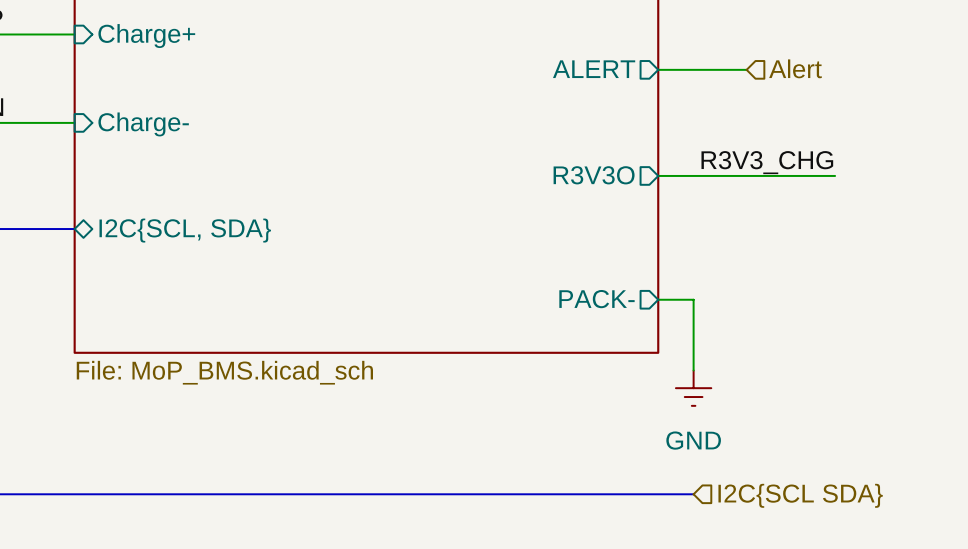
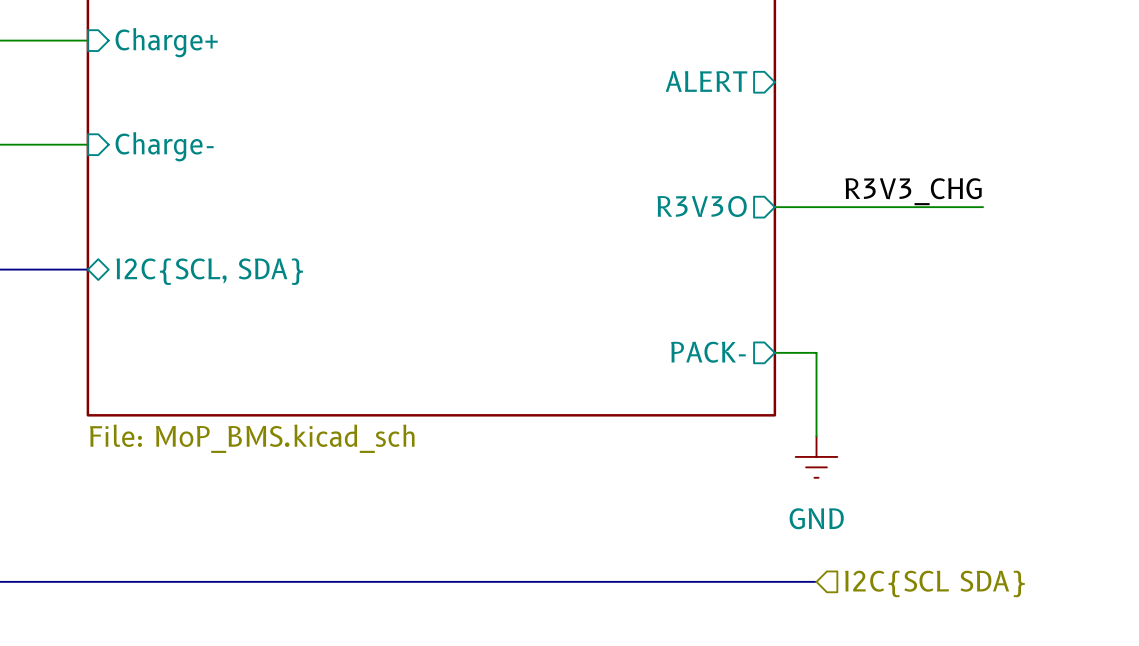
hierarchical label: Alert (795, 68) -> none
wire: (658, 69) (746, 69) -> none

